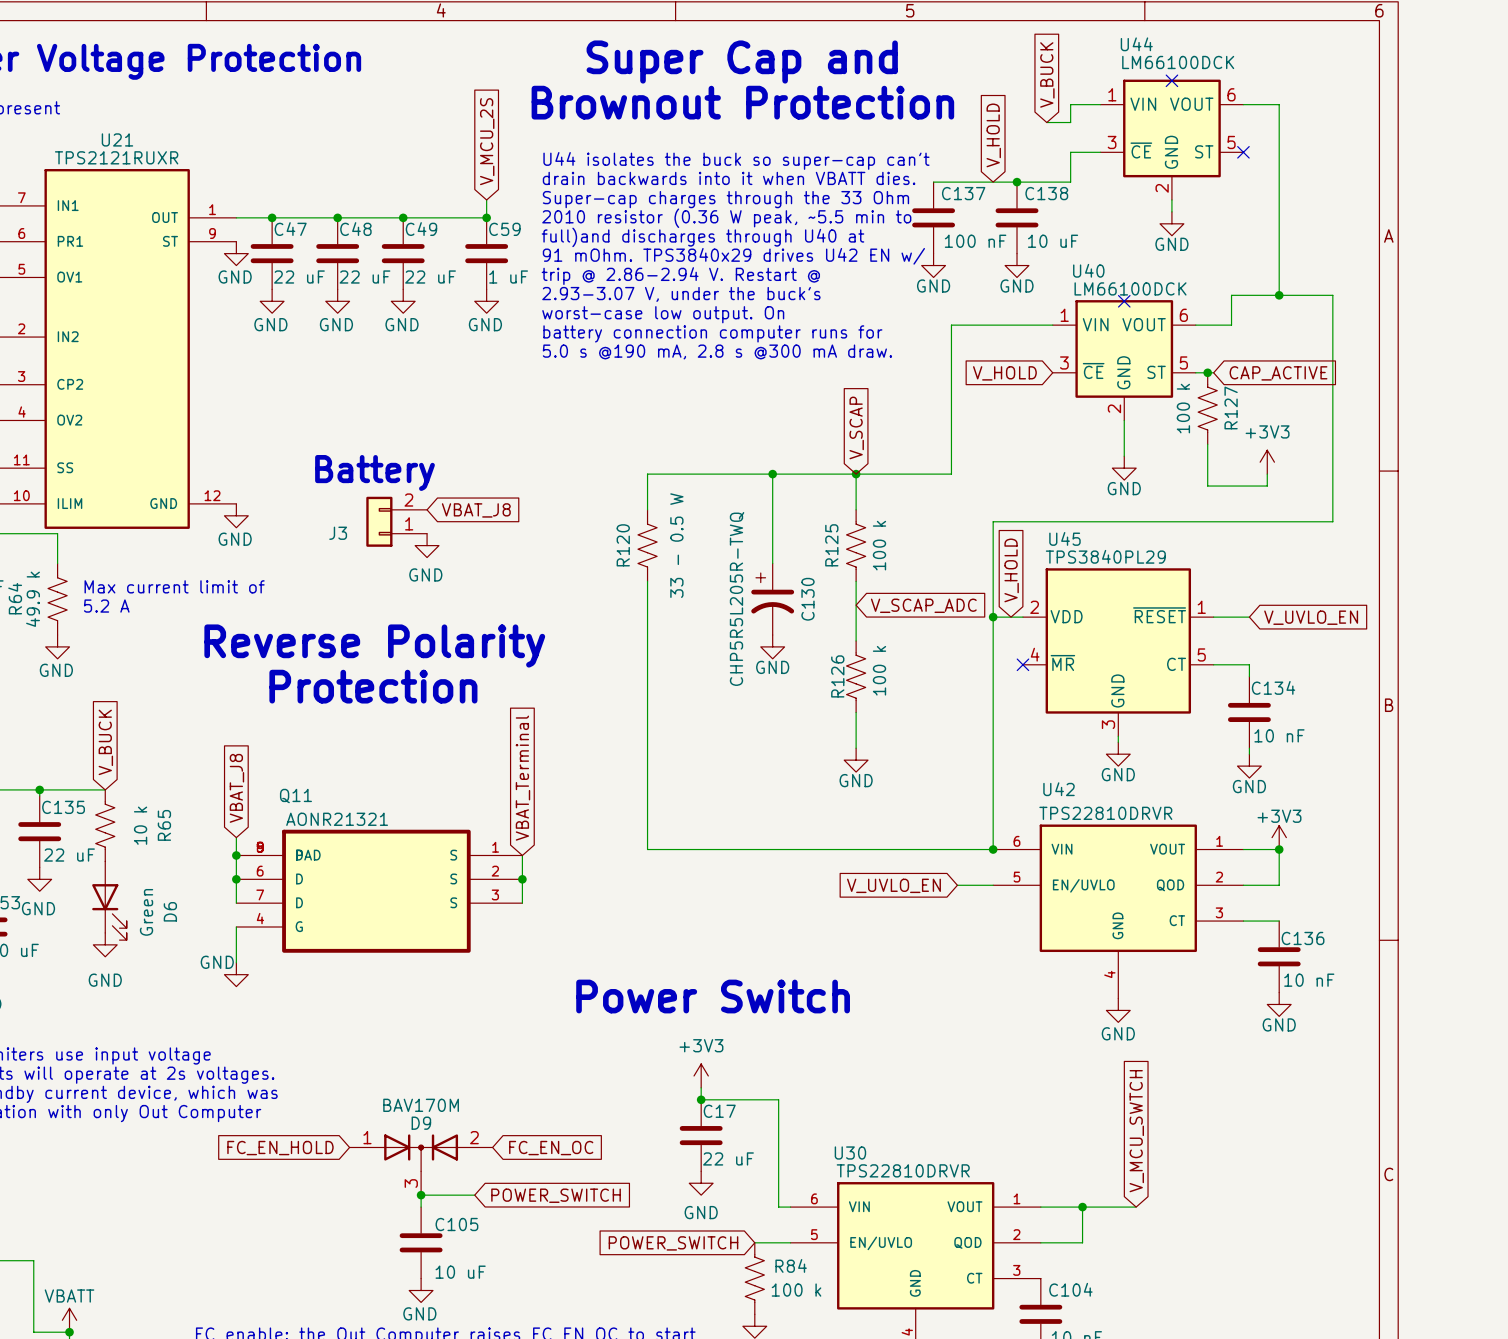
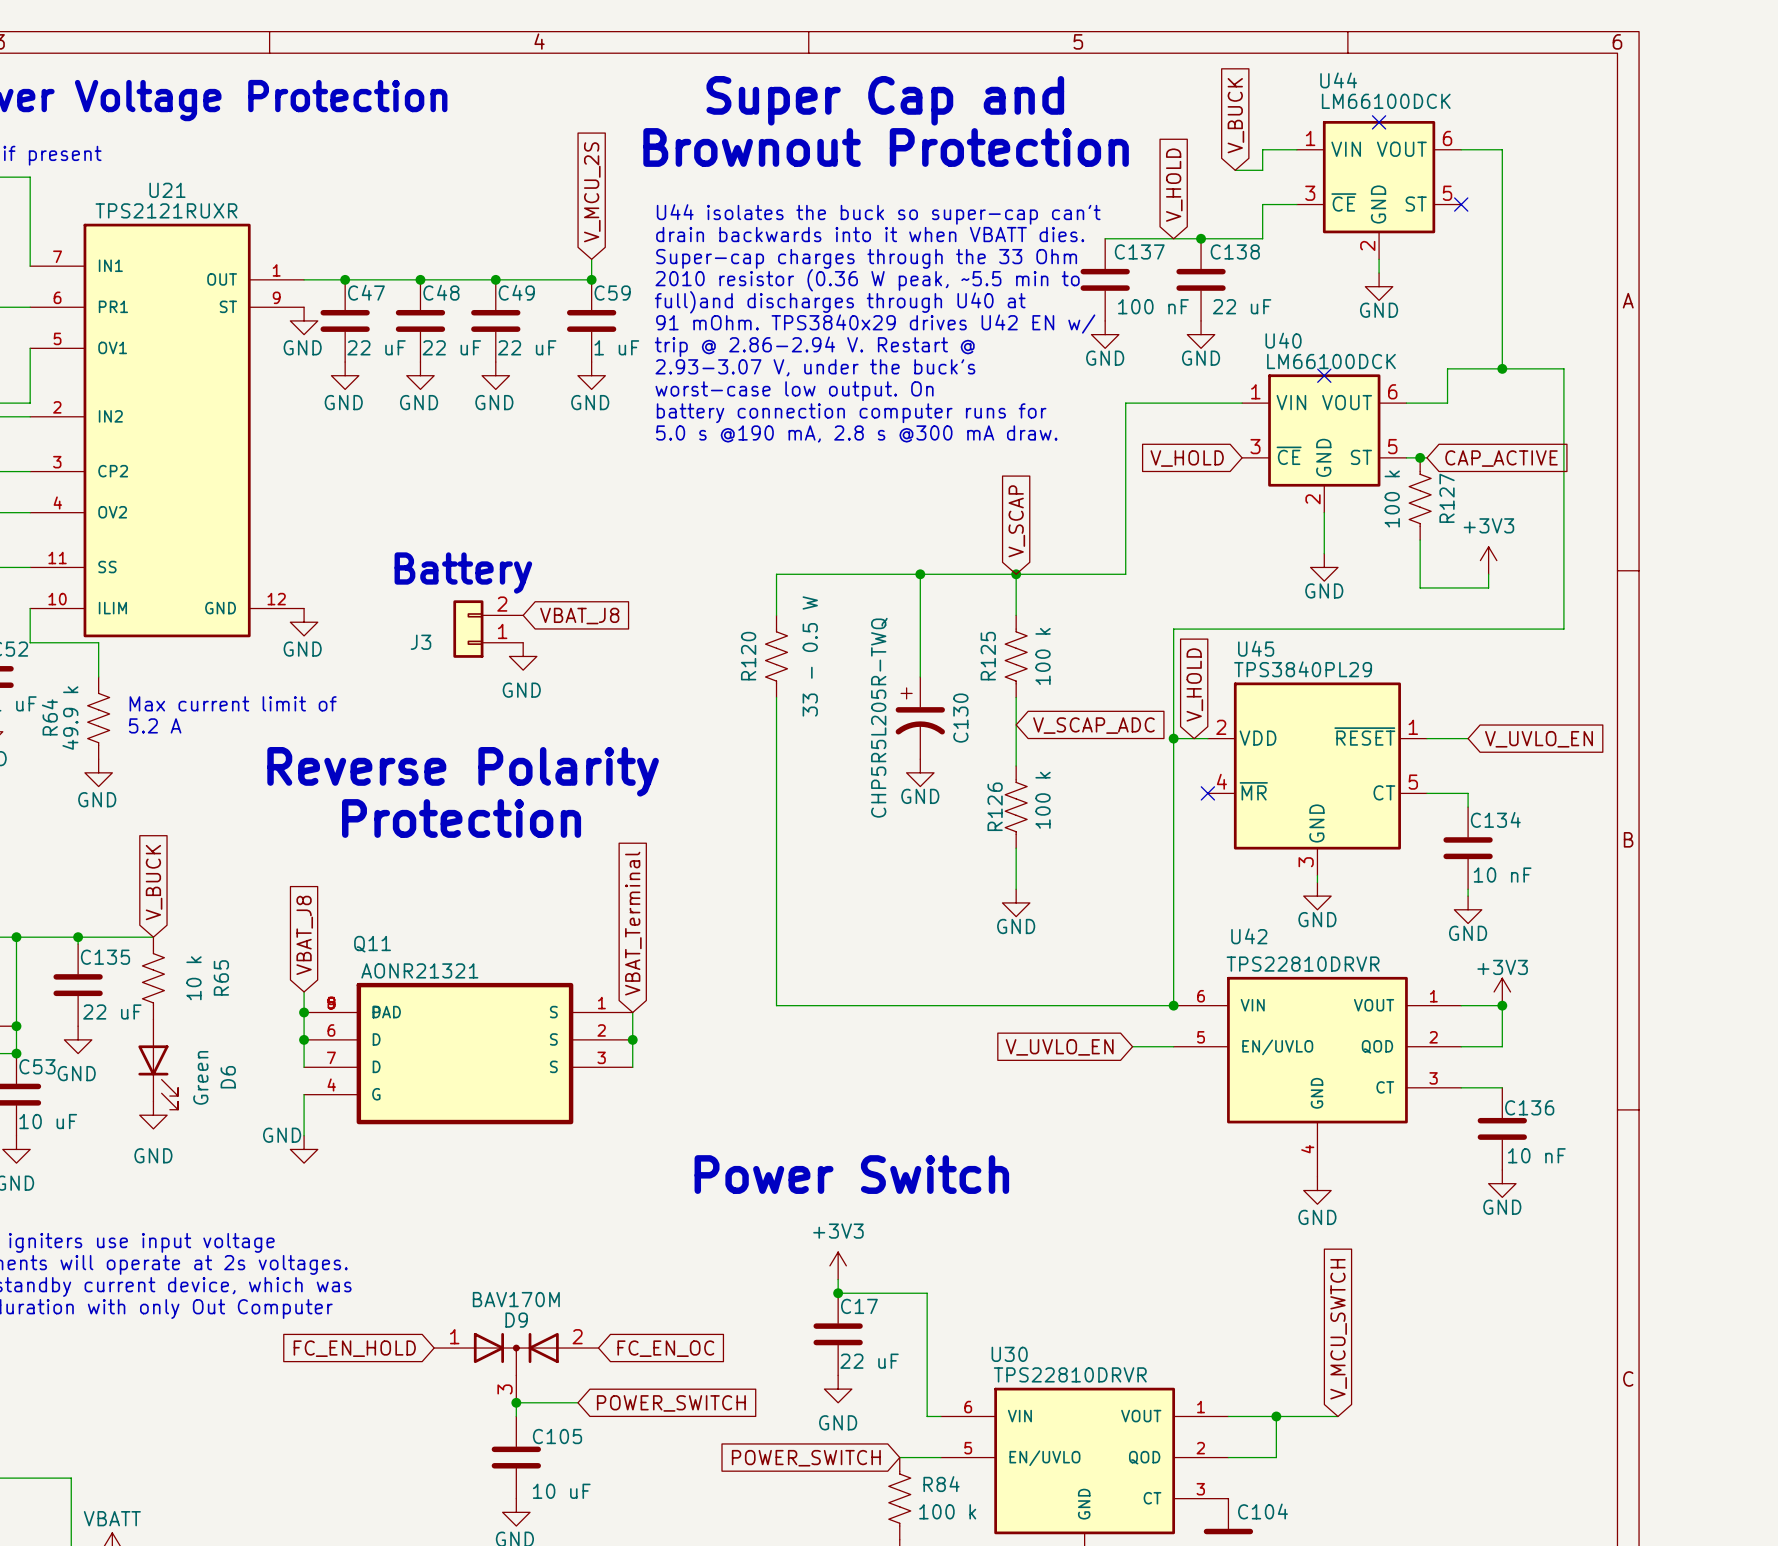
C138 value: 10 uF (1053, 241) -> 22 uF (1242, 306)

